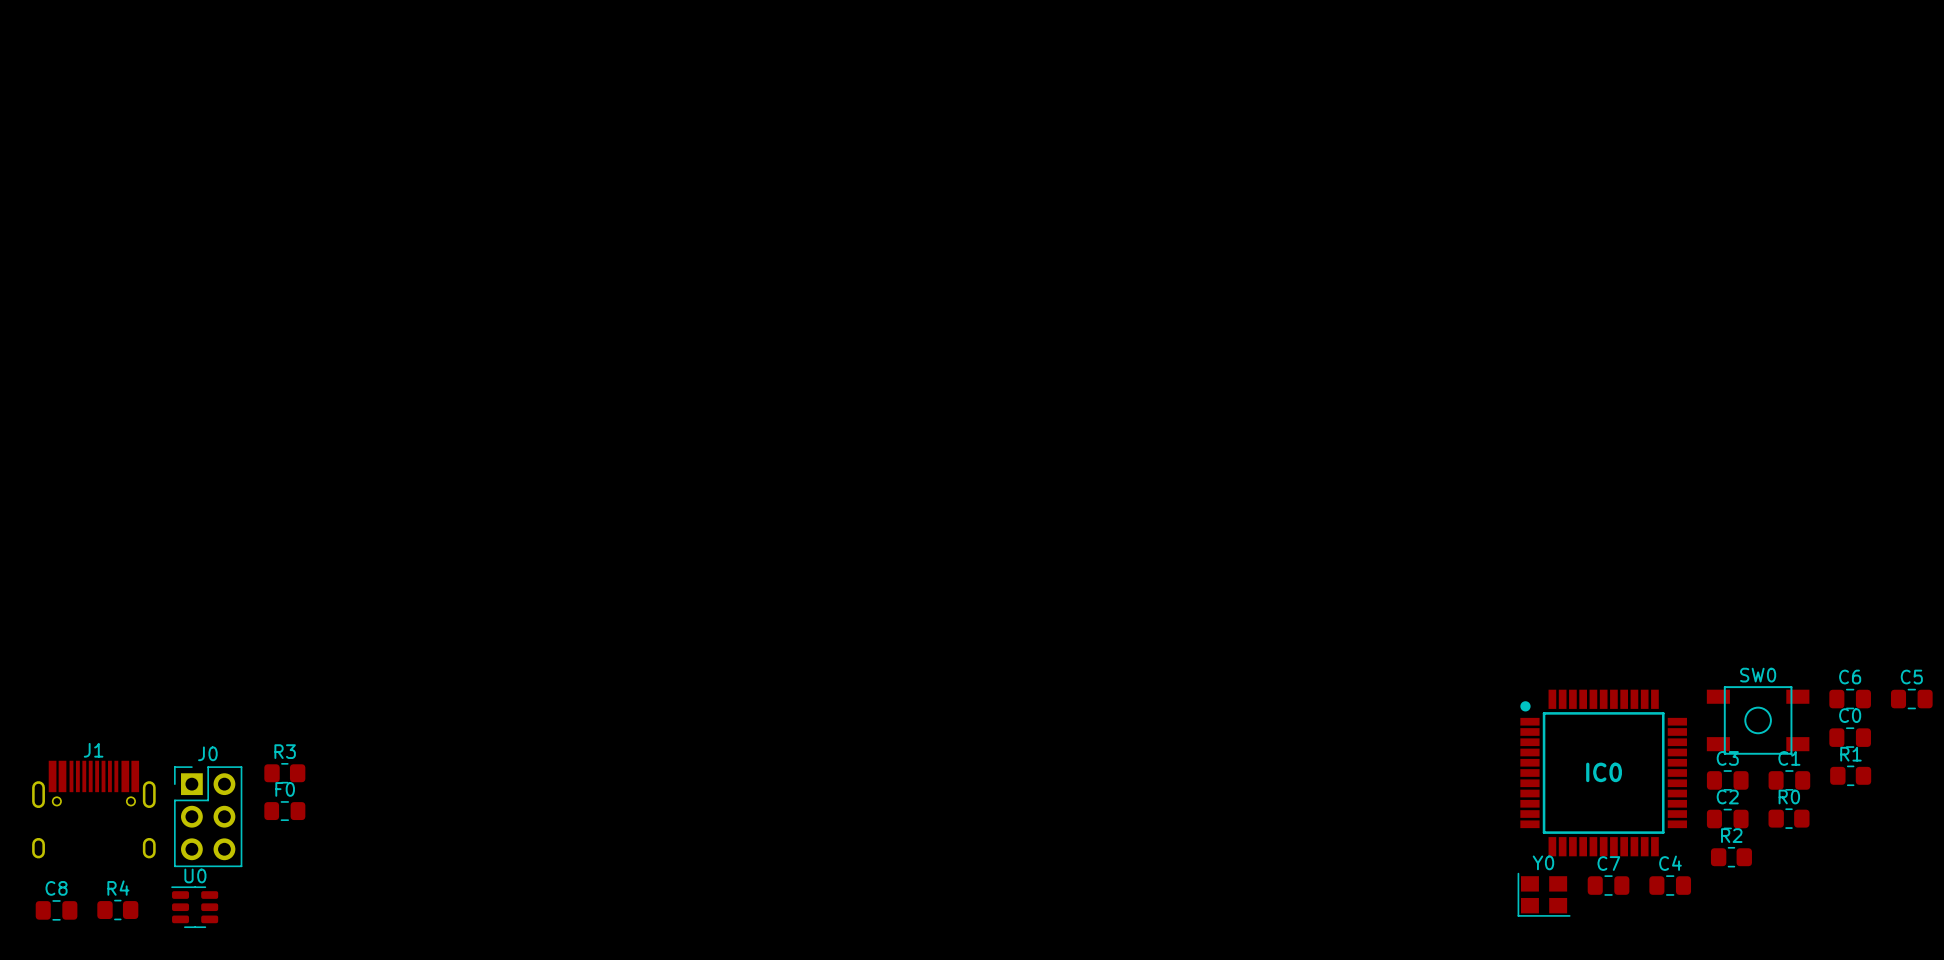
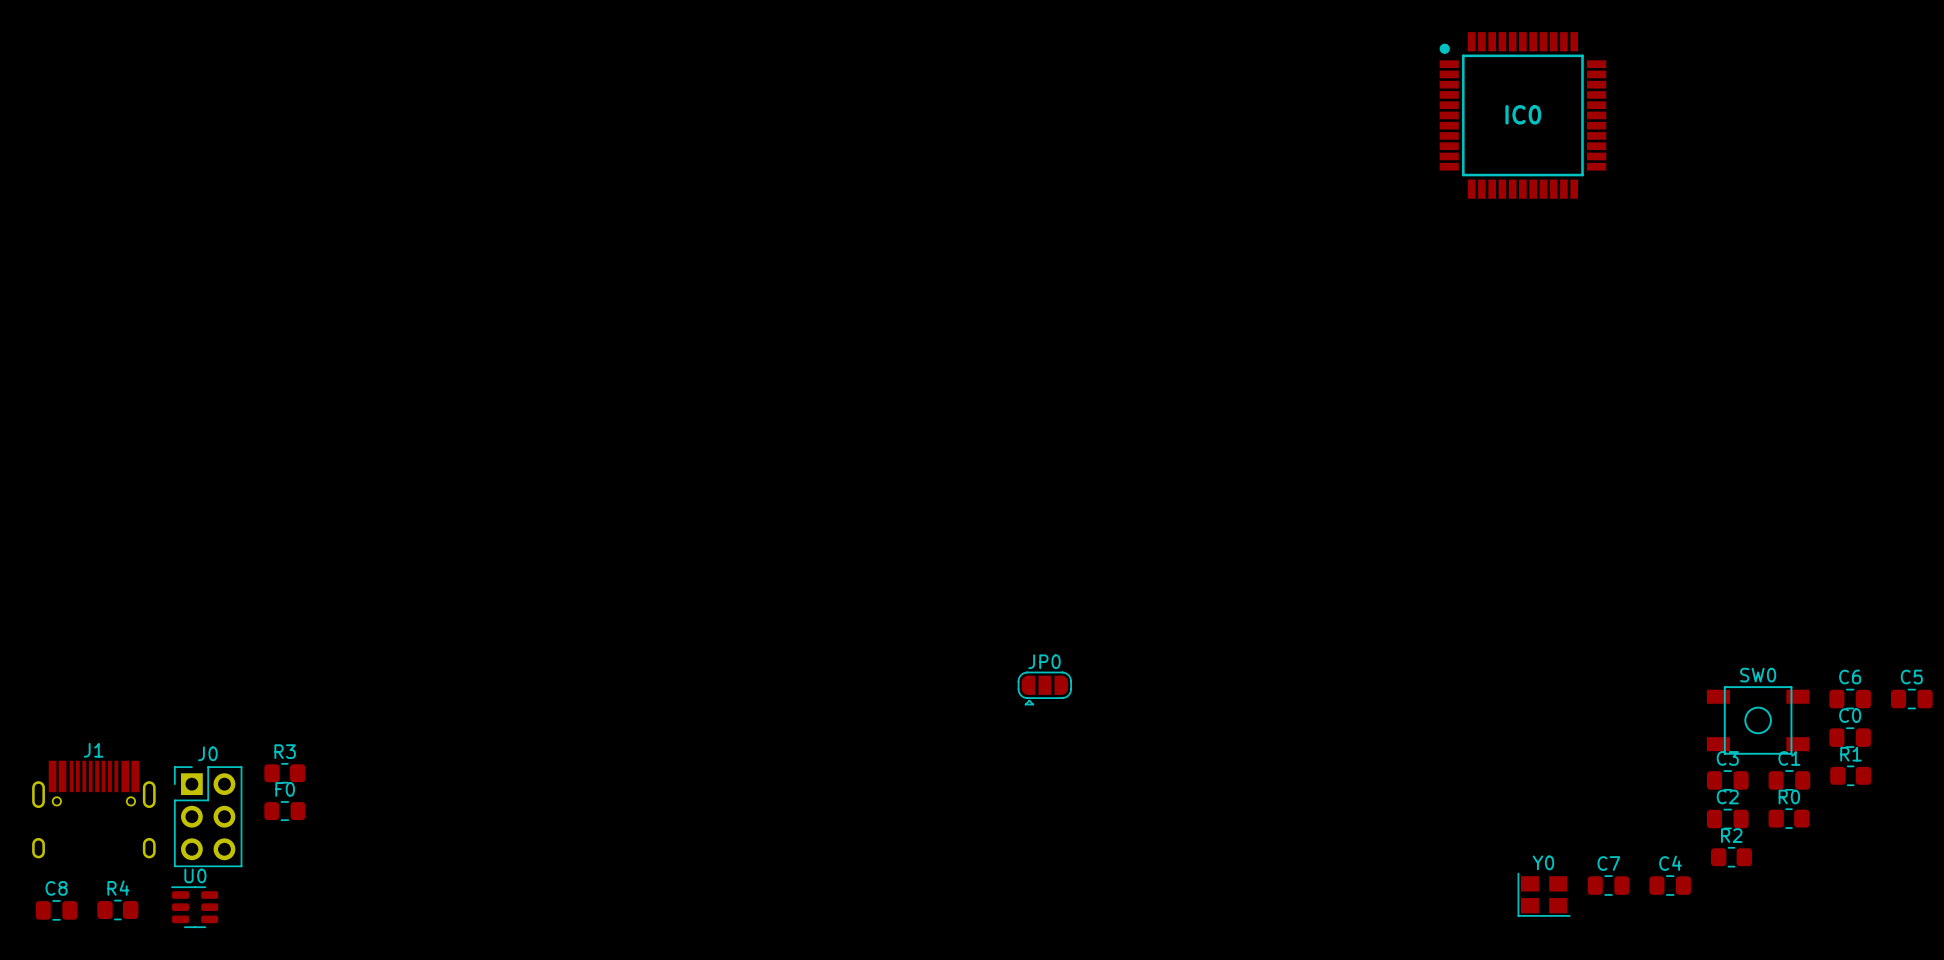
JP0: none -> (1044, 688)
IC0 position: (1603, 773) -> (1522, 115)

